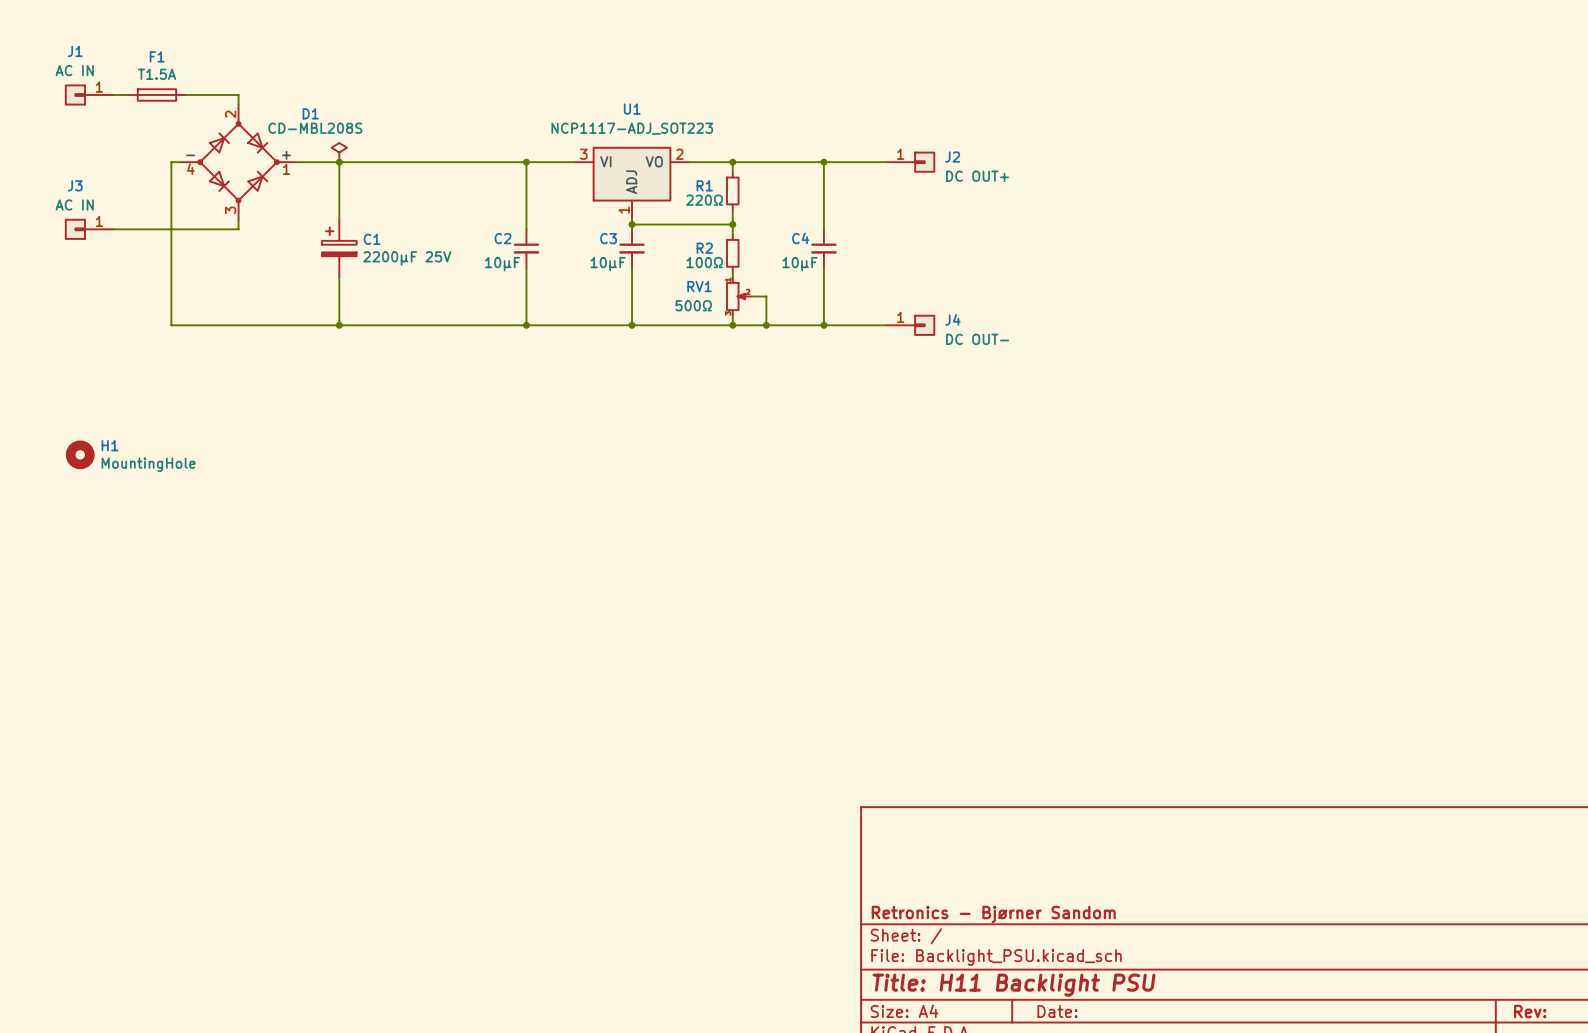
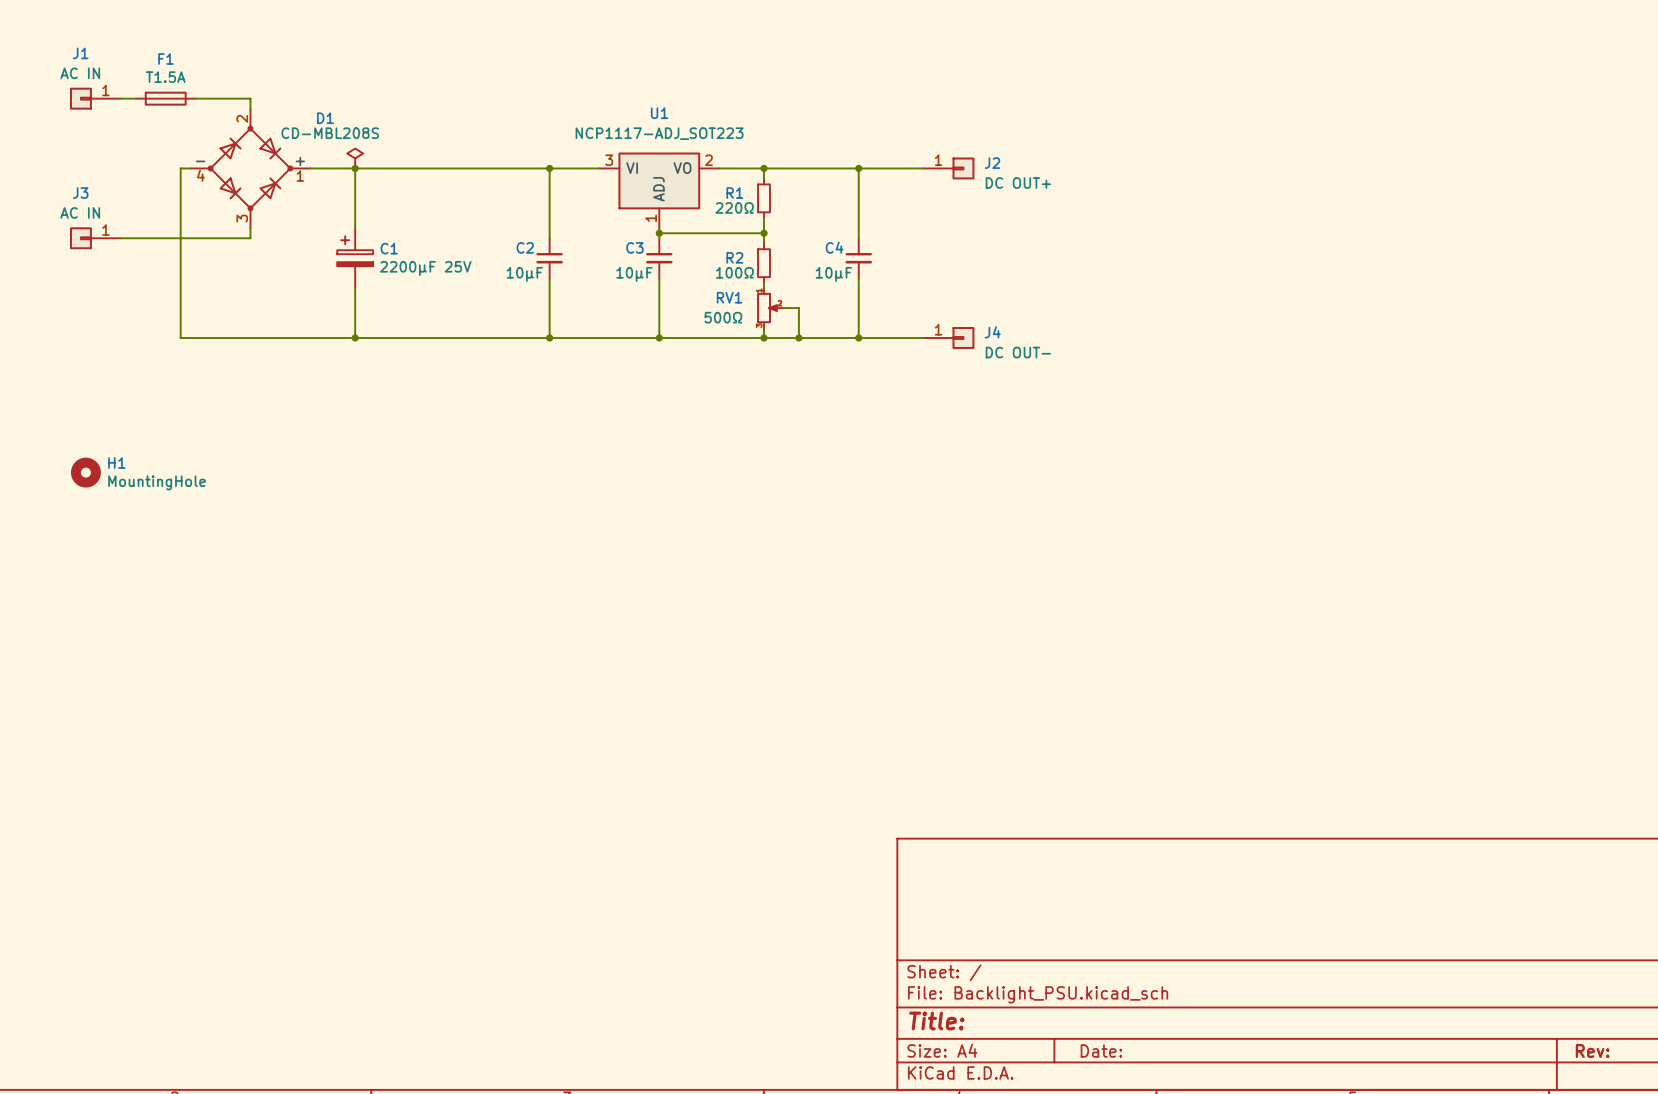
title block: Retronics - Bjørner Sandom (993, 914) -> none
title block: Title: H11 Backlight PSU (1013, 985) -> Title: (936, 1021)

